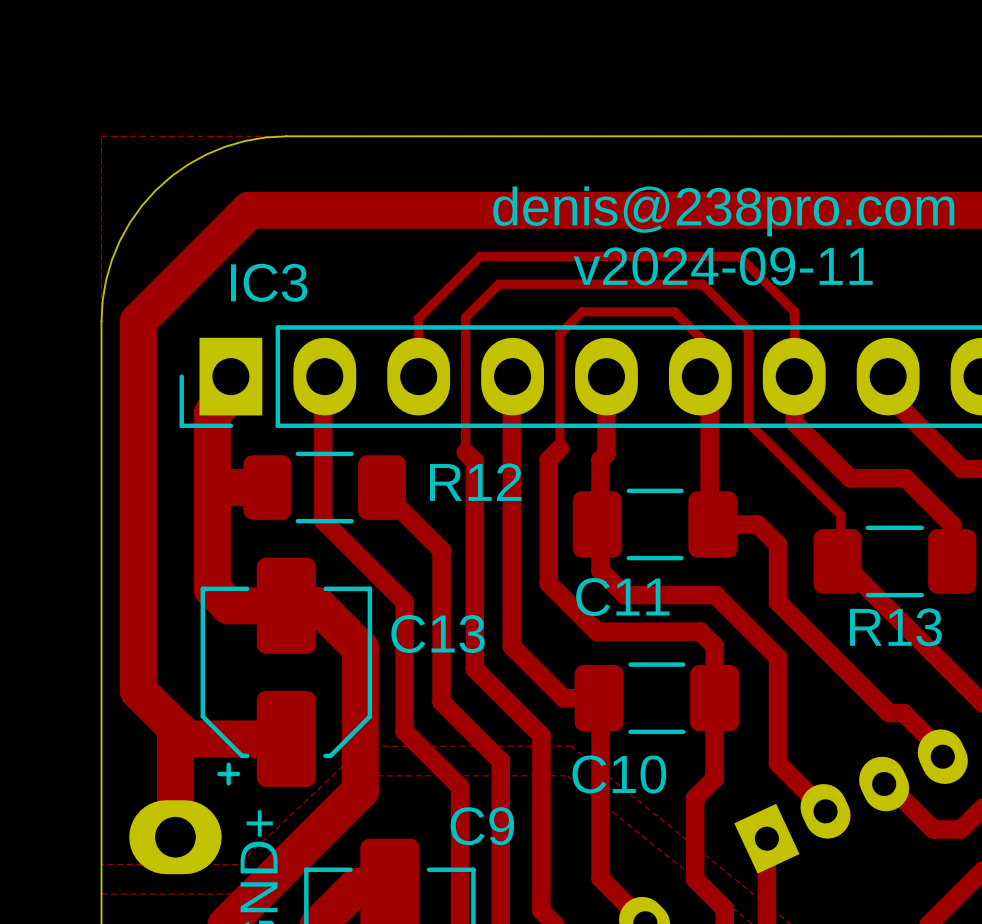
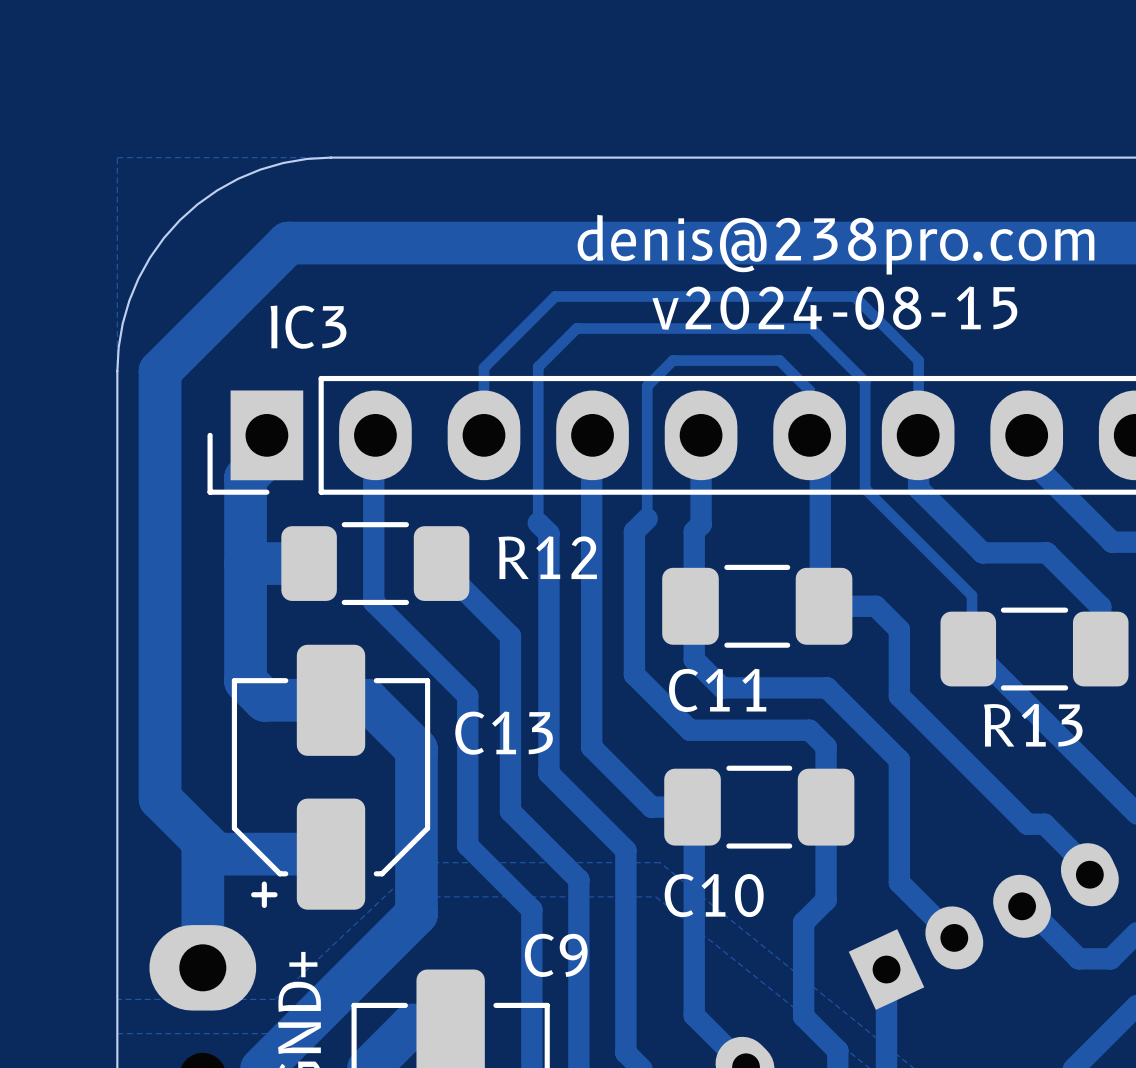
text: v2024-09-11 (723, 266) -> v2024-08-15 (834, 308)

